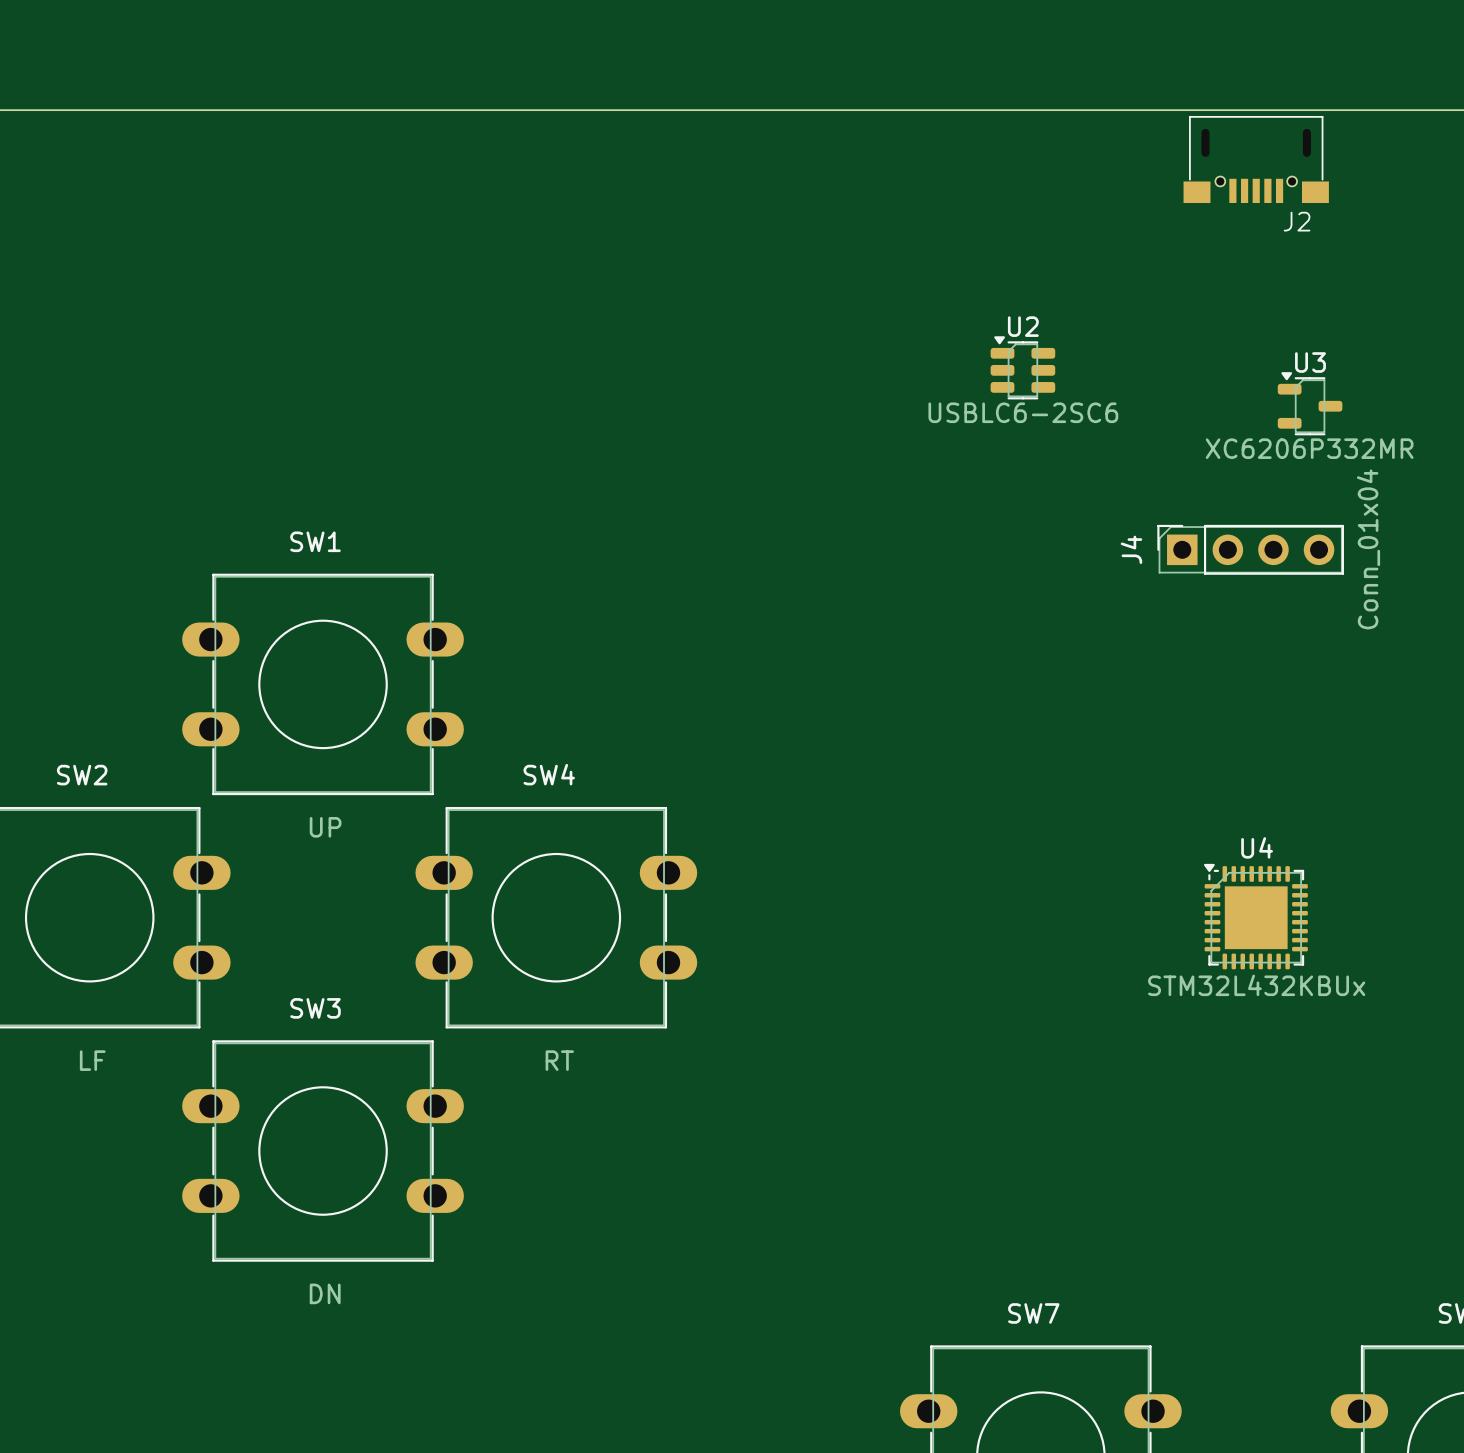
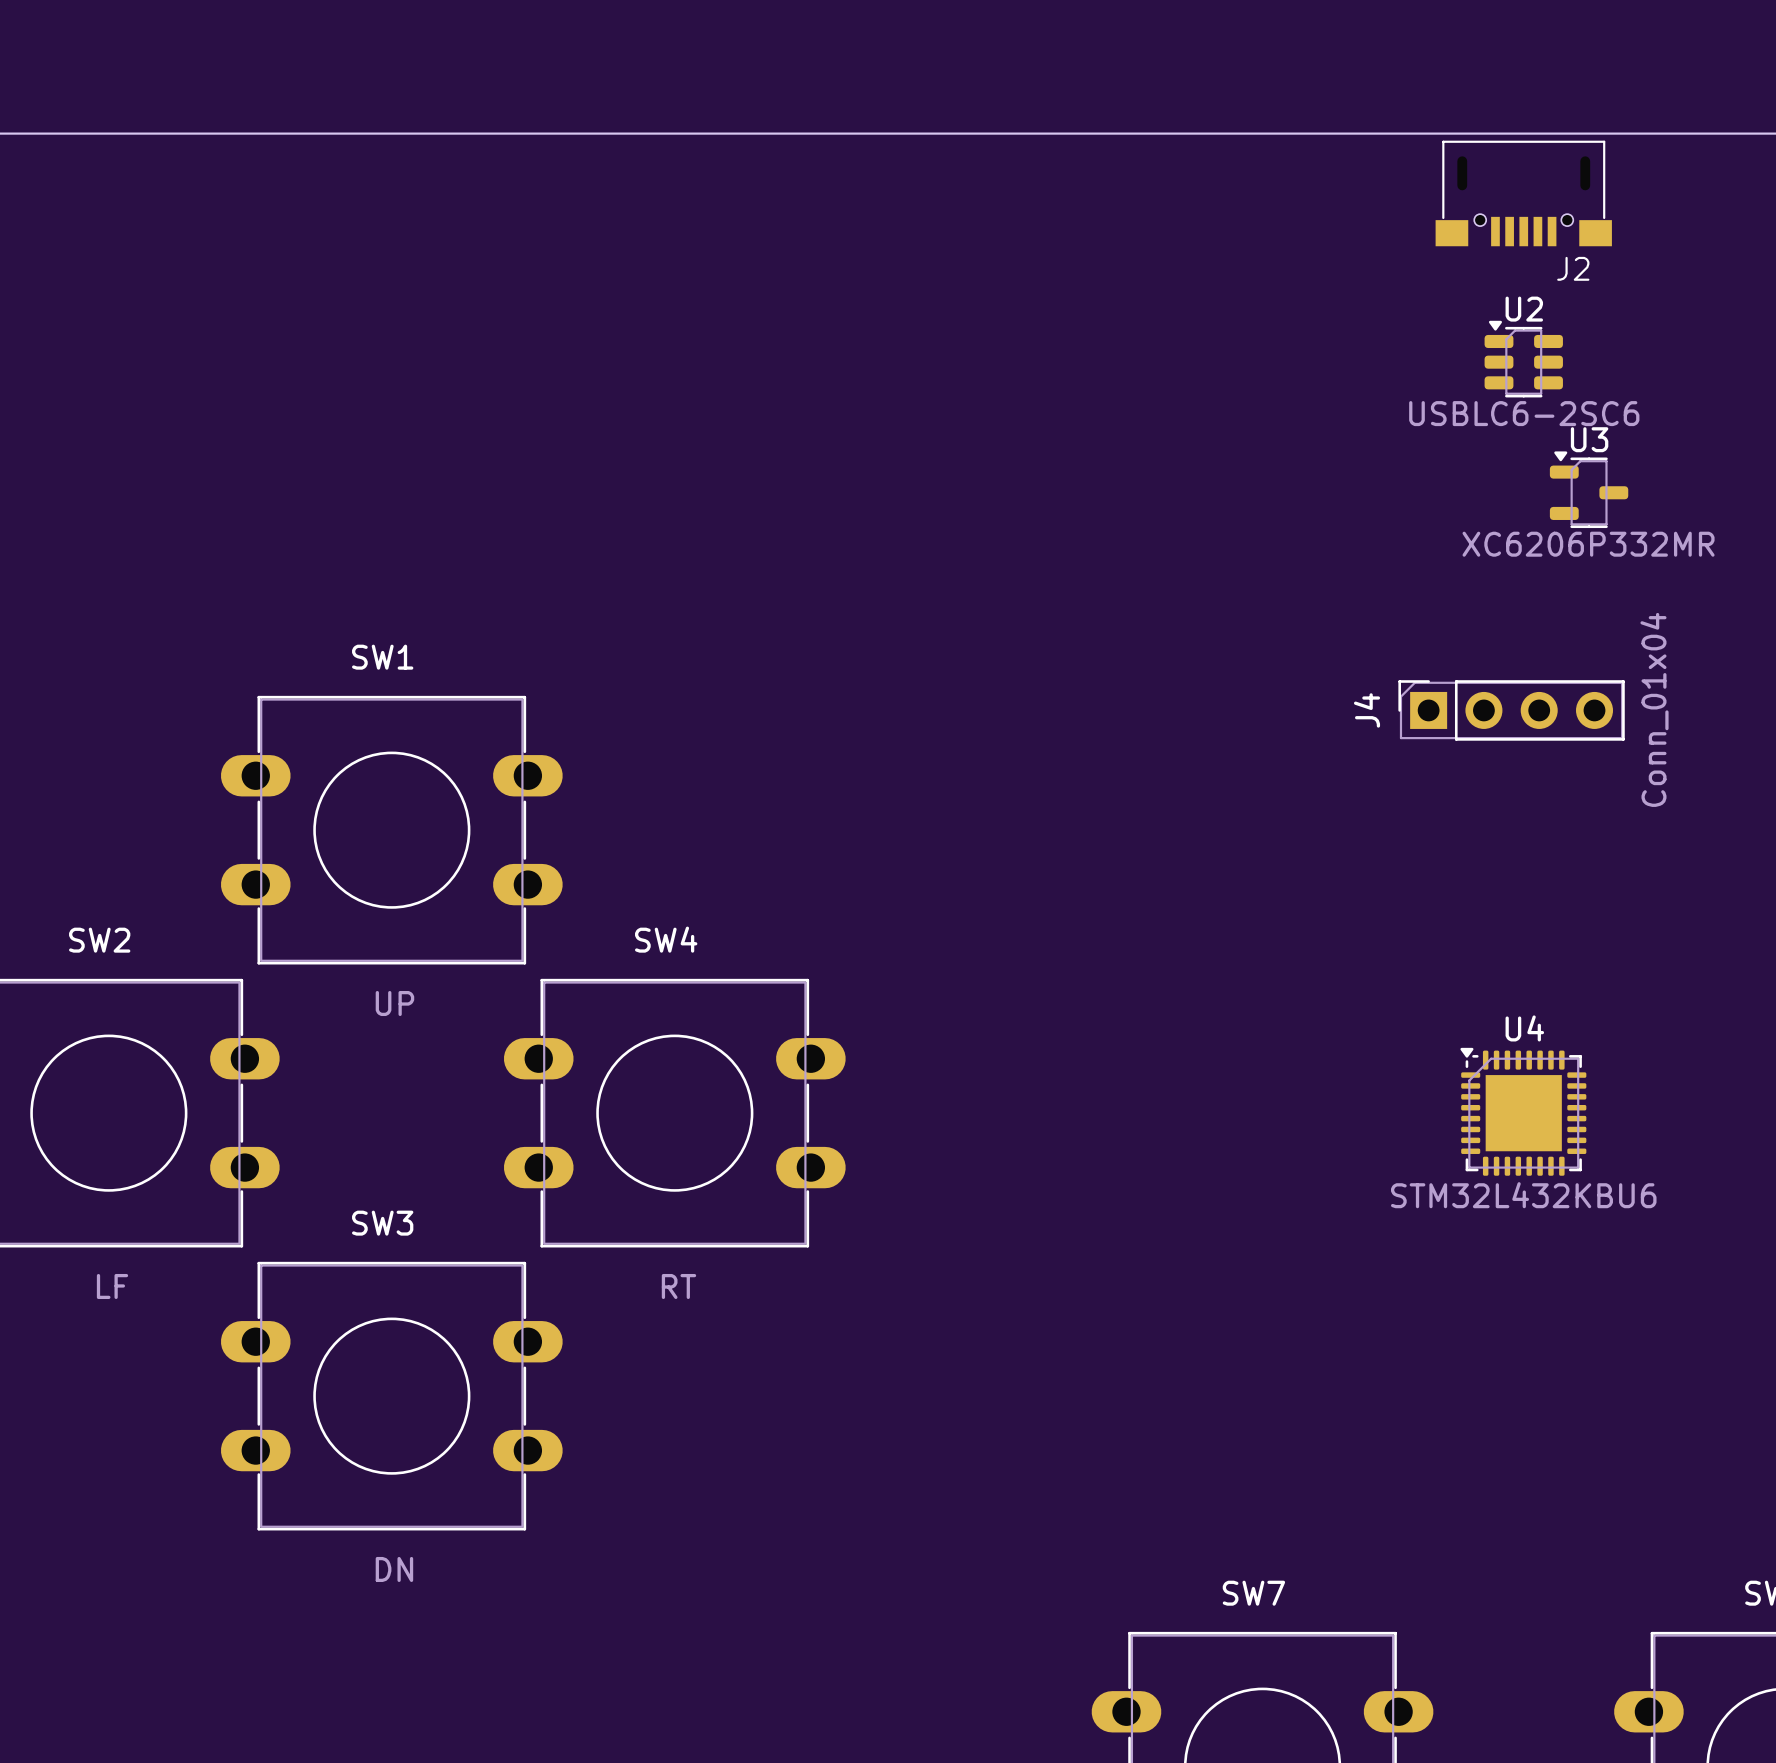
U2 position: (1022, 367) -> (1523, 359)
J4 position: (1250, 549) -> (1511, 710)
U4 value: STM32L432KBUx (1256, 985) -> STM32L432KBU6 (1523, 1195)

